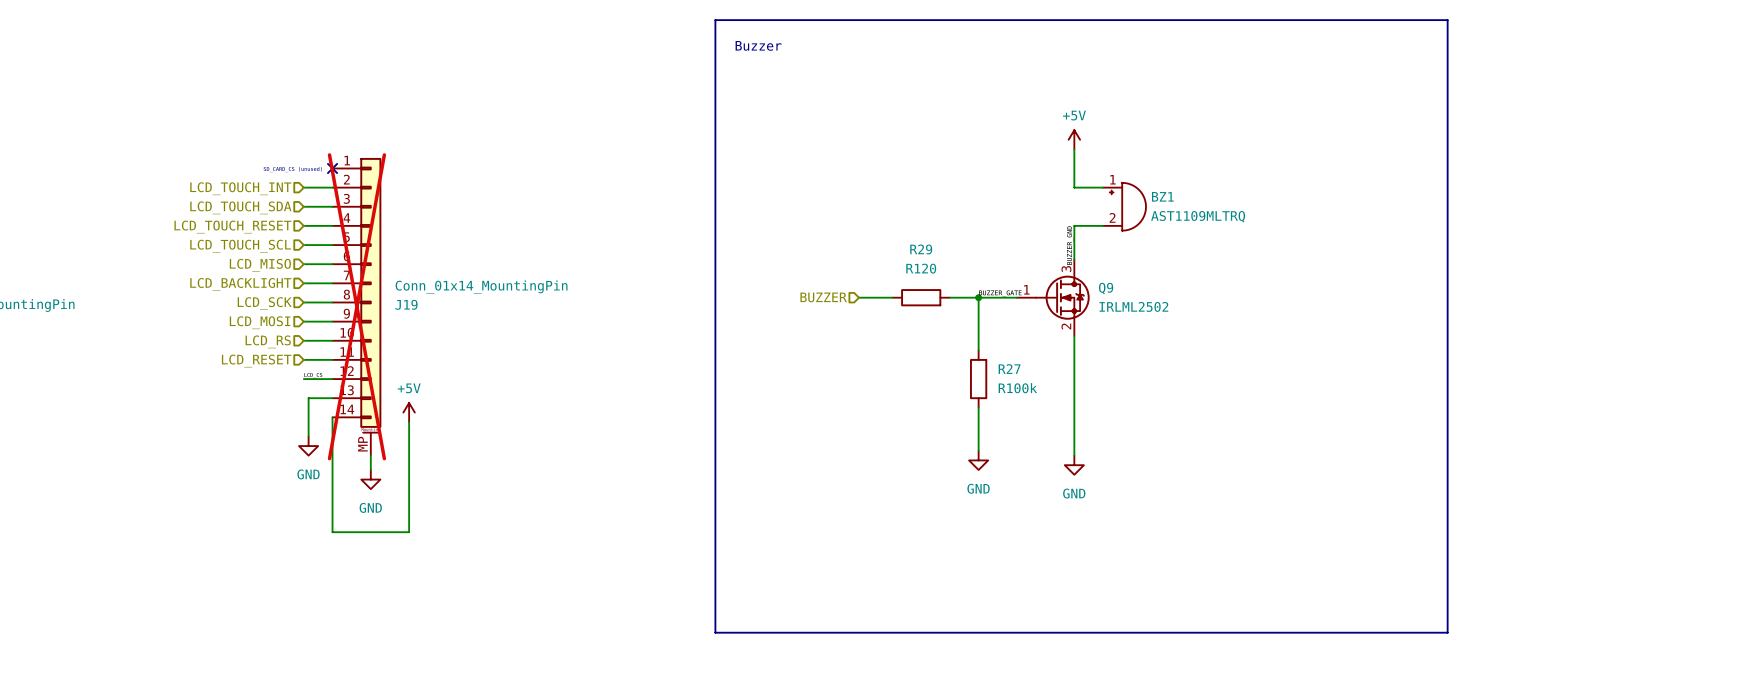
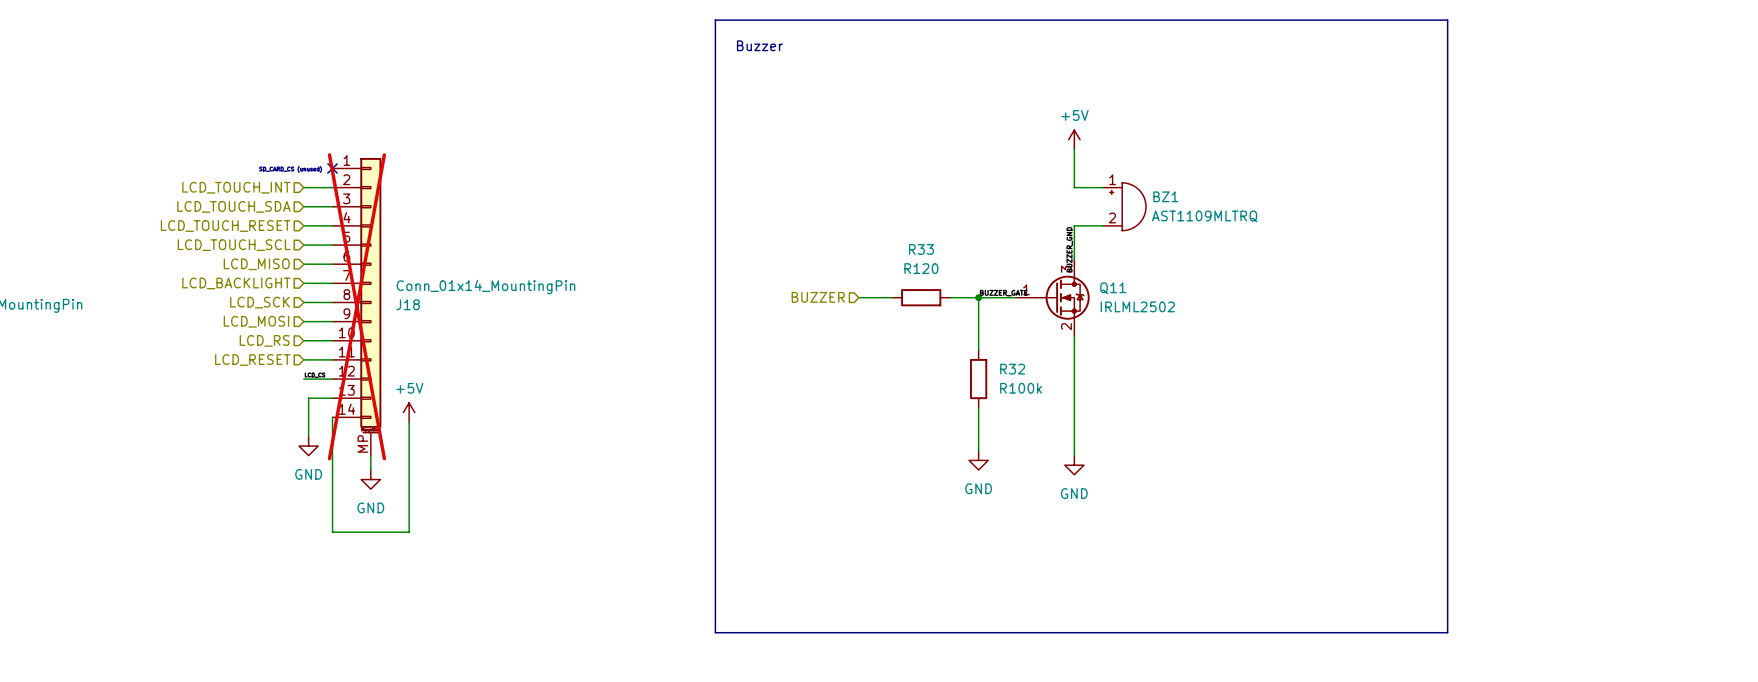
R29 name: R29 (921, 249) -> R33 (921, 249)
Q9 name: Q9 (1106, 288) -> Q11 (1113, 288)
J19 name: J19 (406, 304) -> J18 (408, 304)
R27 name: R27 (1009, 369) -> R32 (1012, 369)

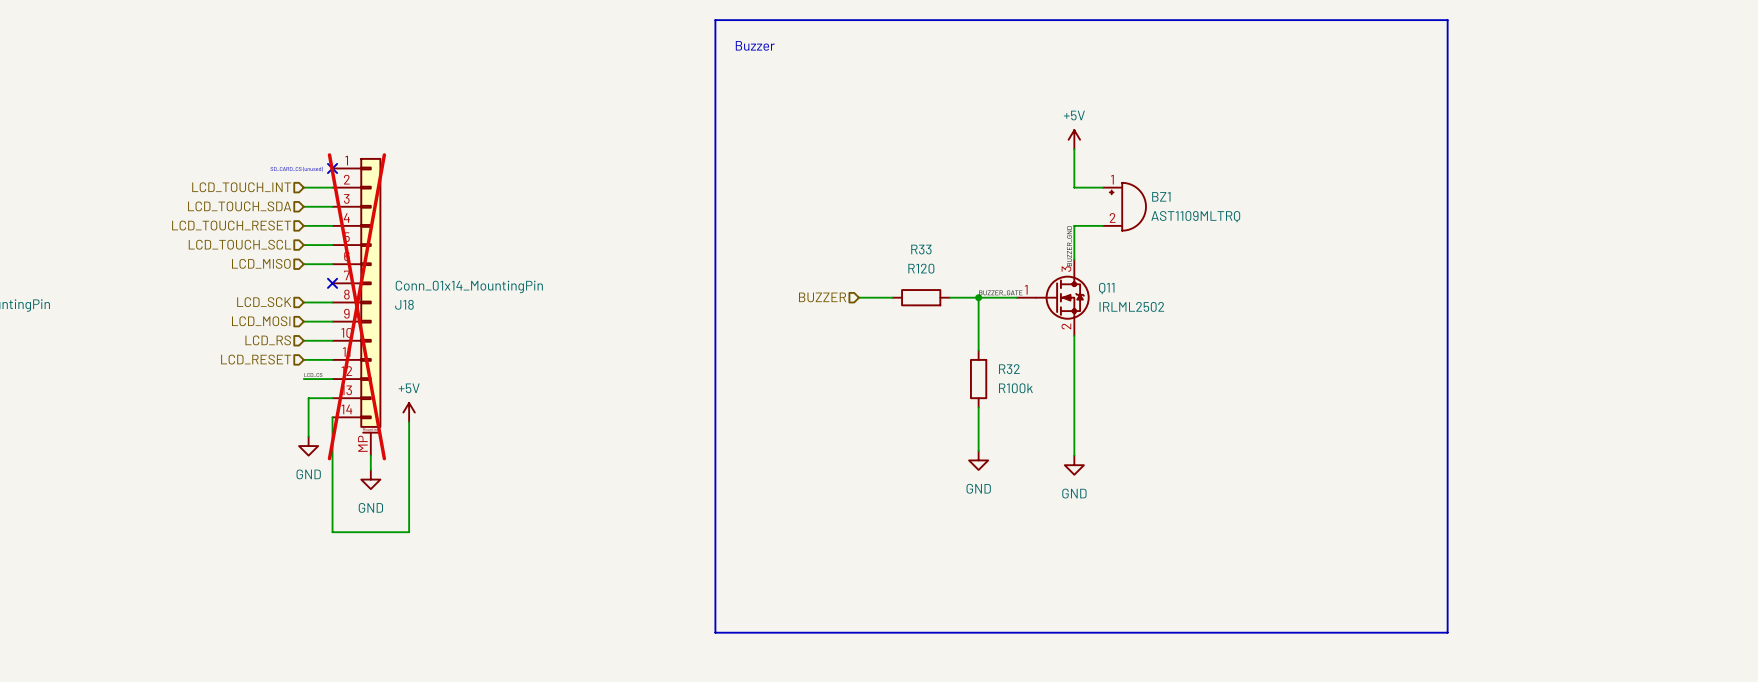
hierarchical label: LCD_BACKLIGHT (236, 283) -> none
wire: (303, 283) (332, 283) -> none
no-connect mark: none -> (332, 283)

